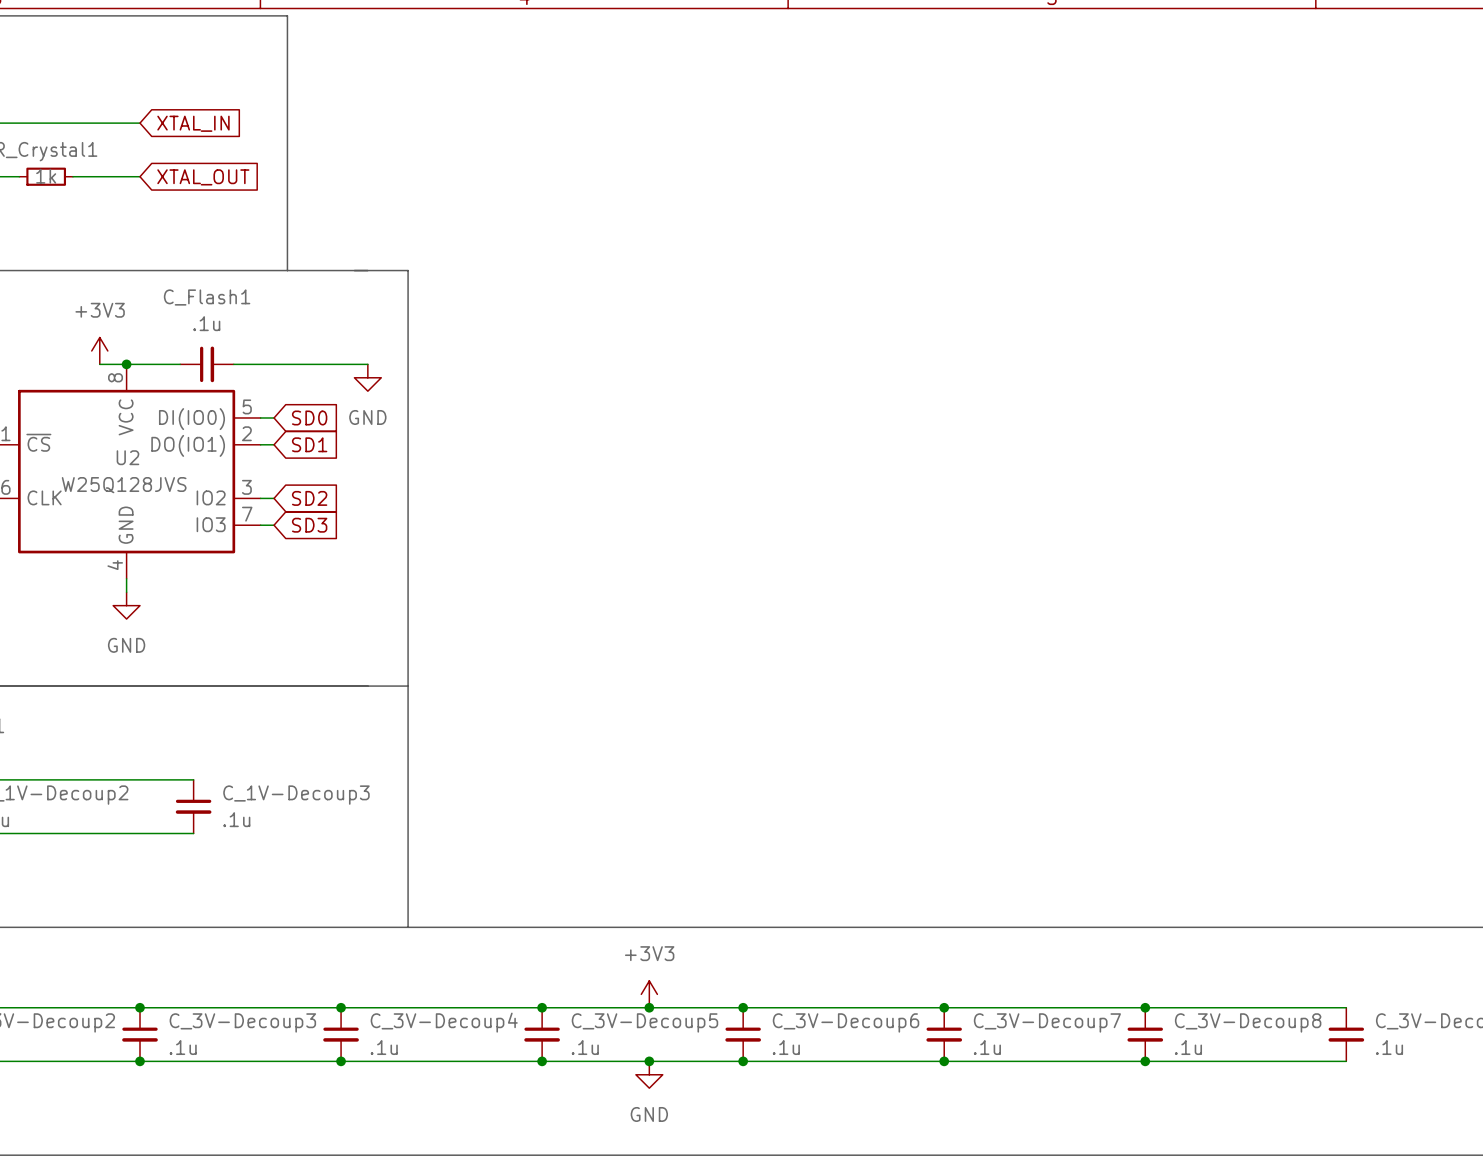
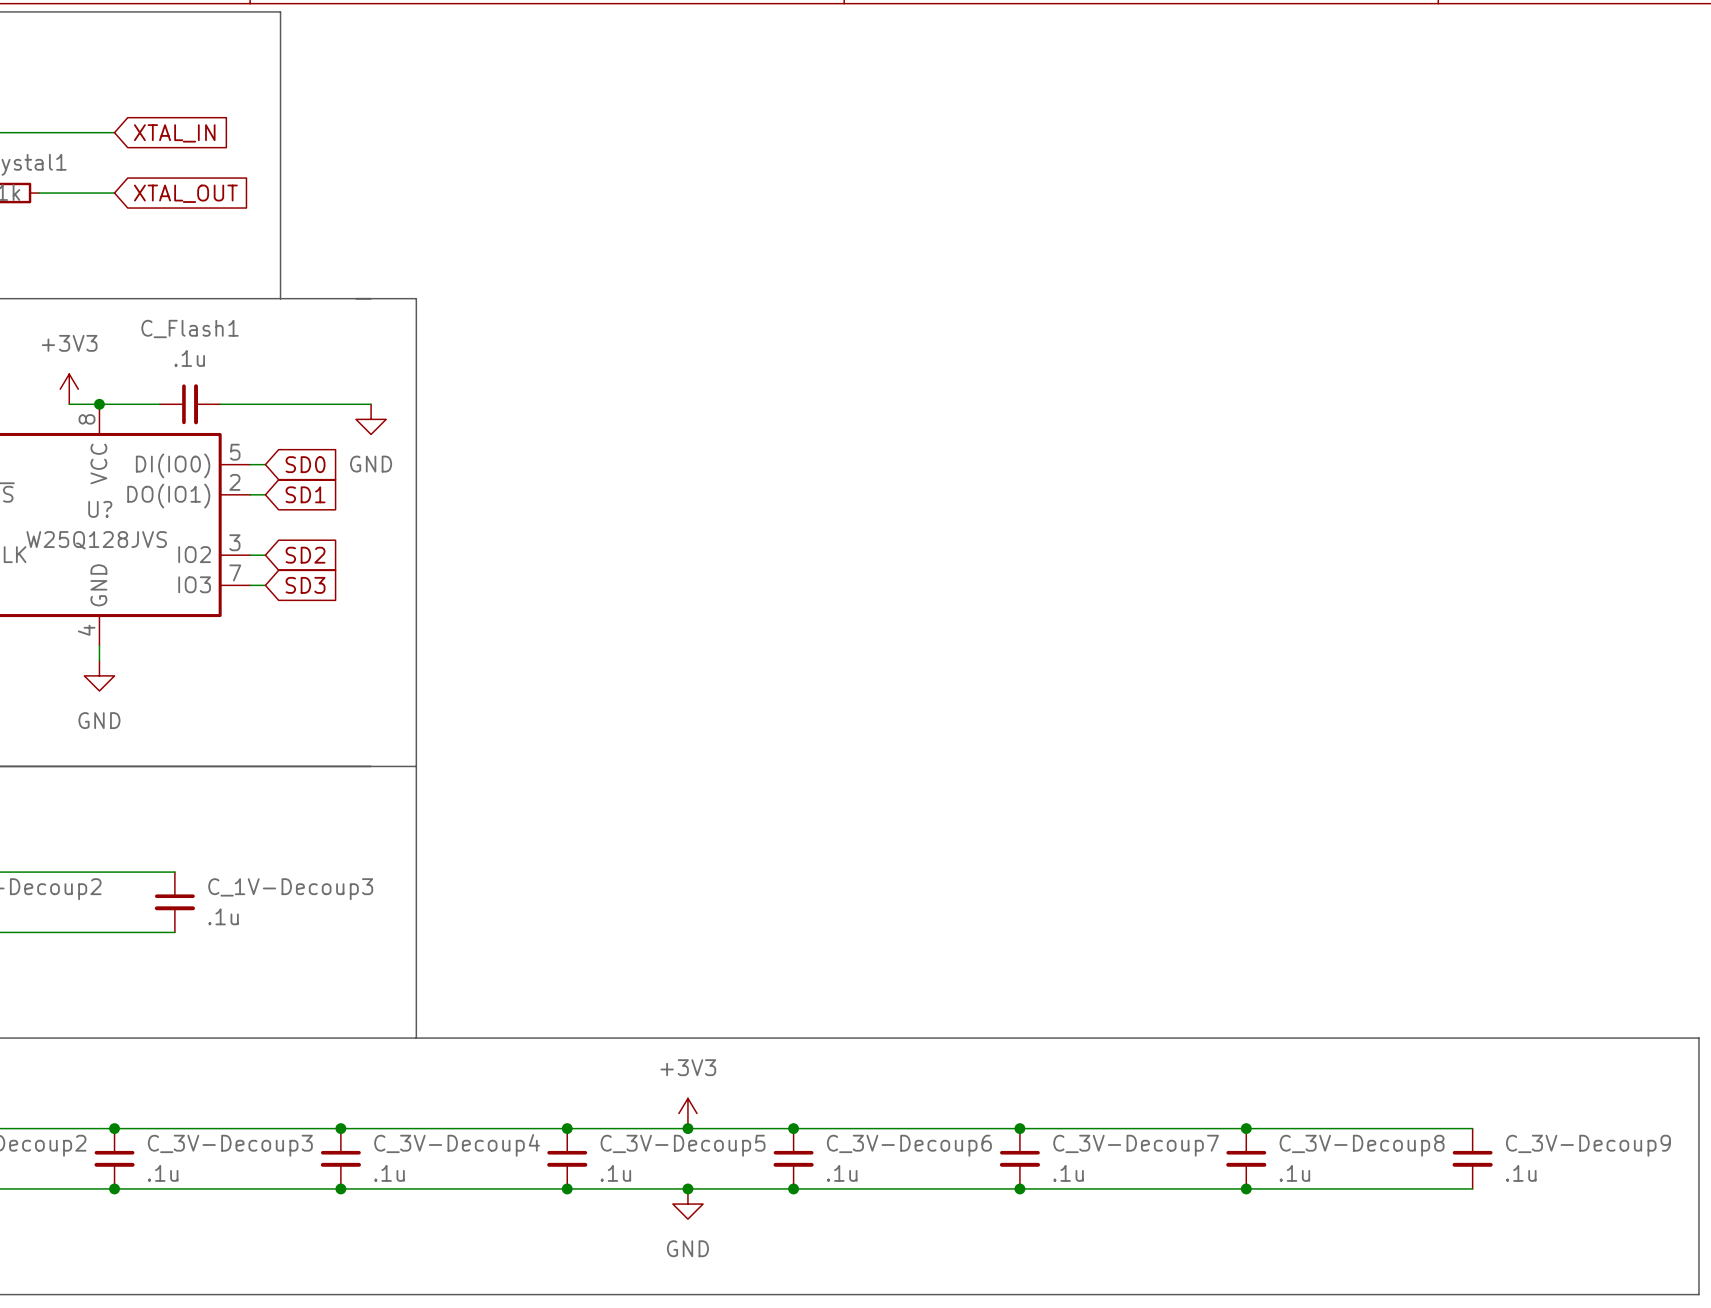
U2 name: U2 (127, 457) -> U? (100, 509)

